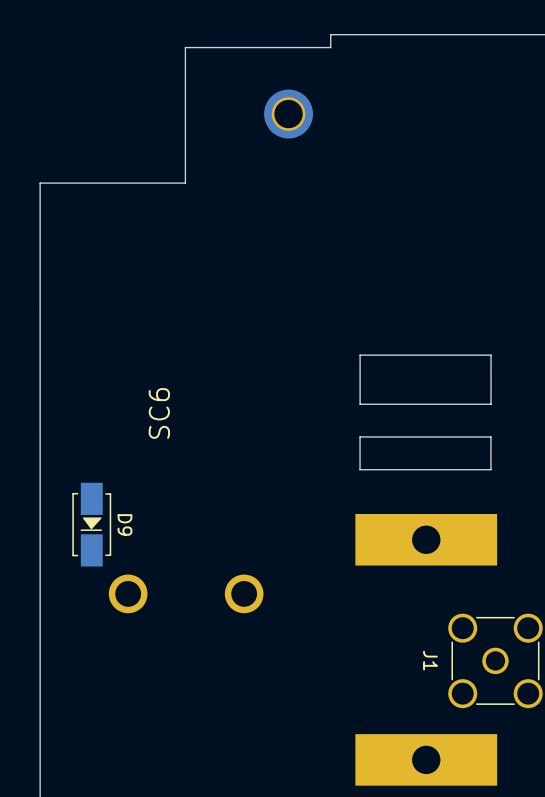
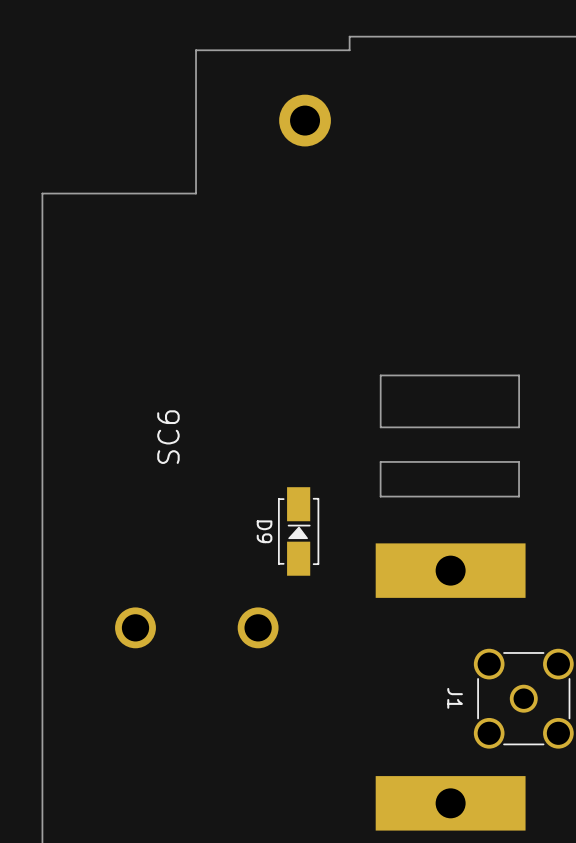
D9 rotation: 0° (91, 524) -> 180° (298, 531)
D9 position: (91, 524) -> (298, 531)

